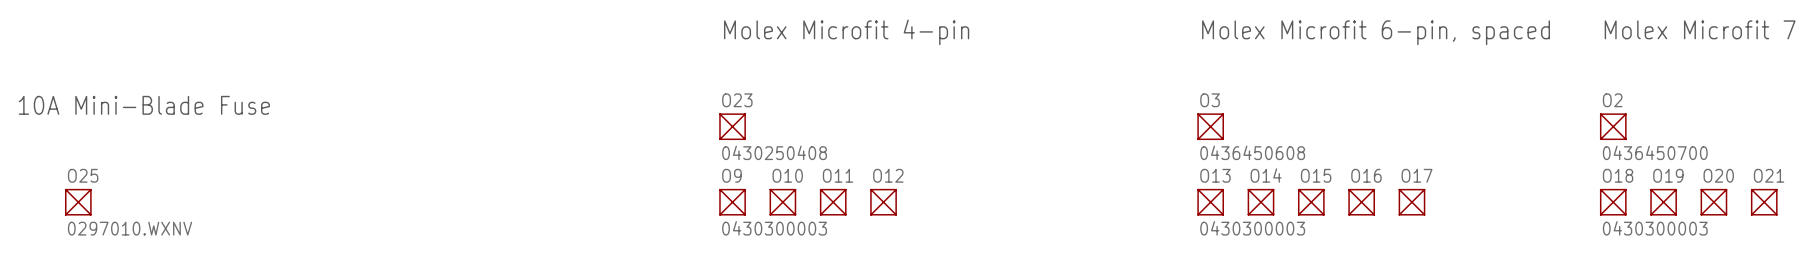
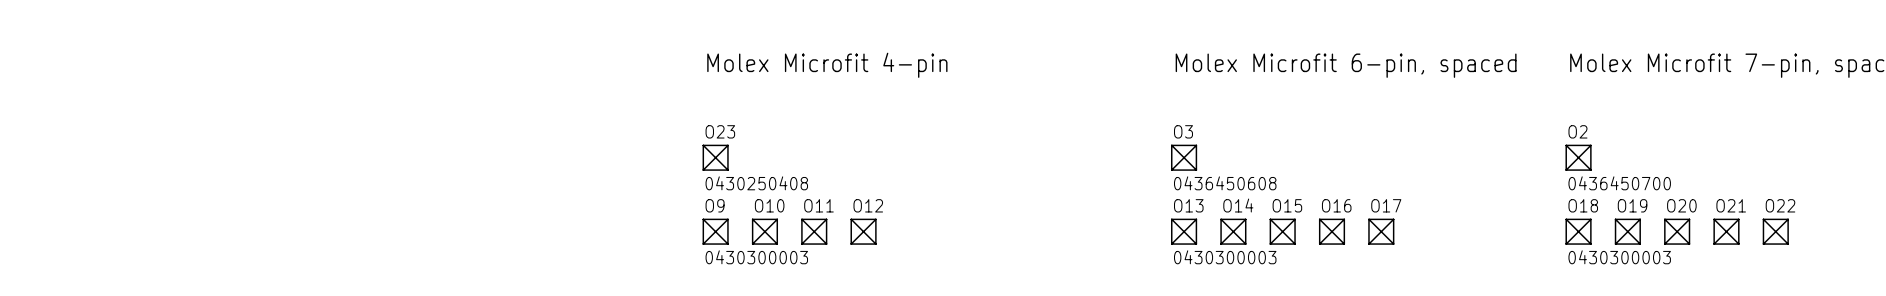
text: 10A Mini-Blade Fuse (144, 105) -> none
O25: (78, 202) -> none

